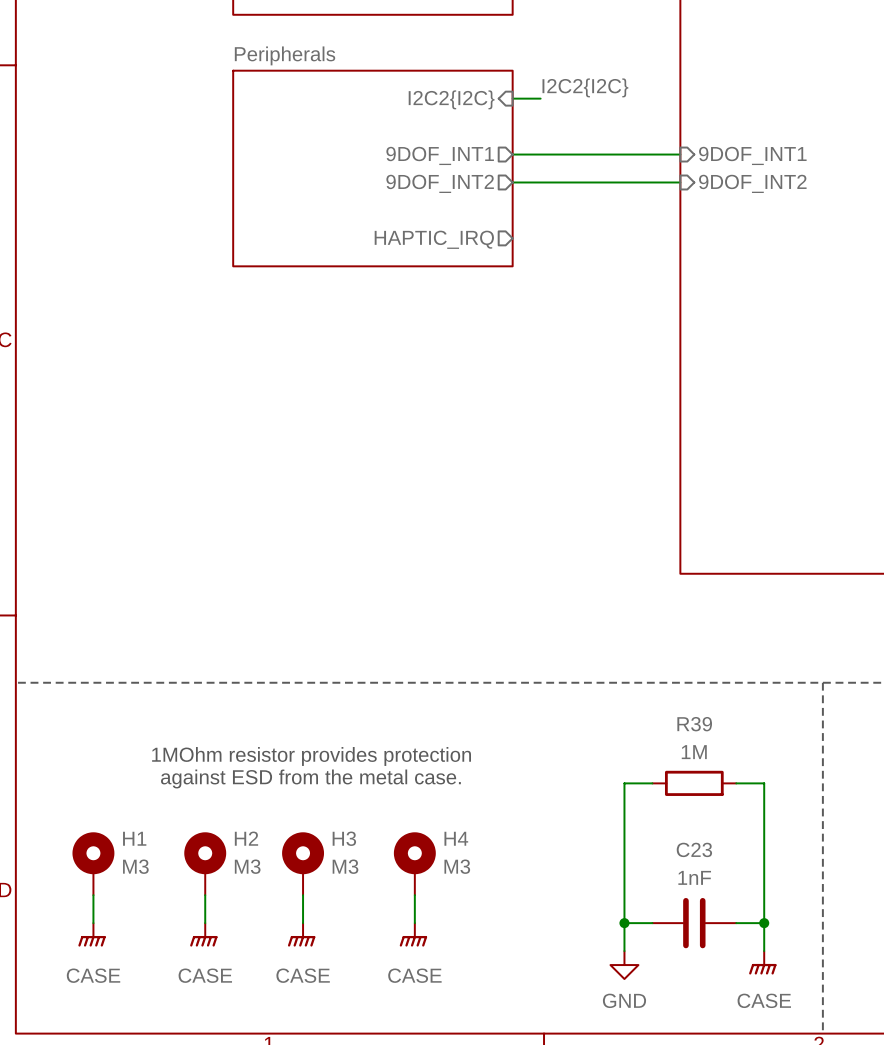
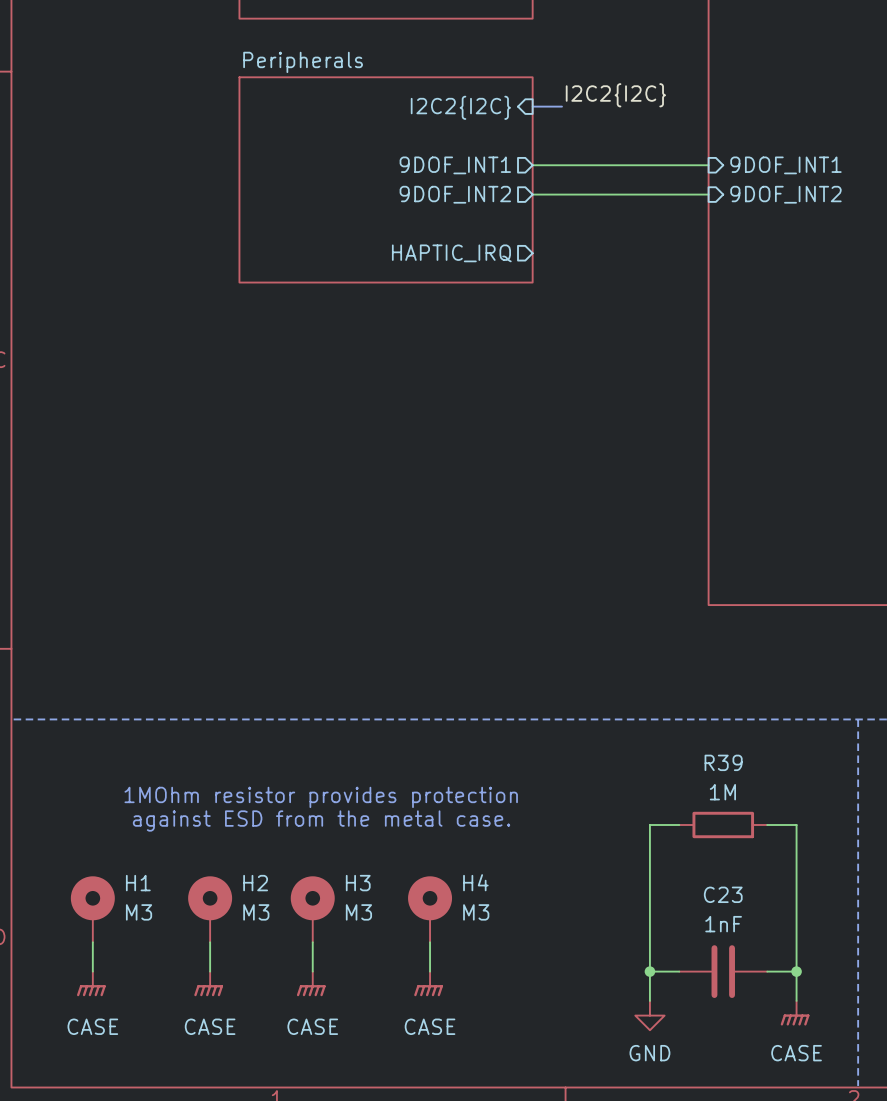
bus: none -> (532, 106) (561, 106)

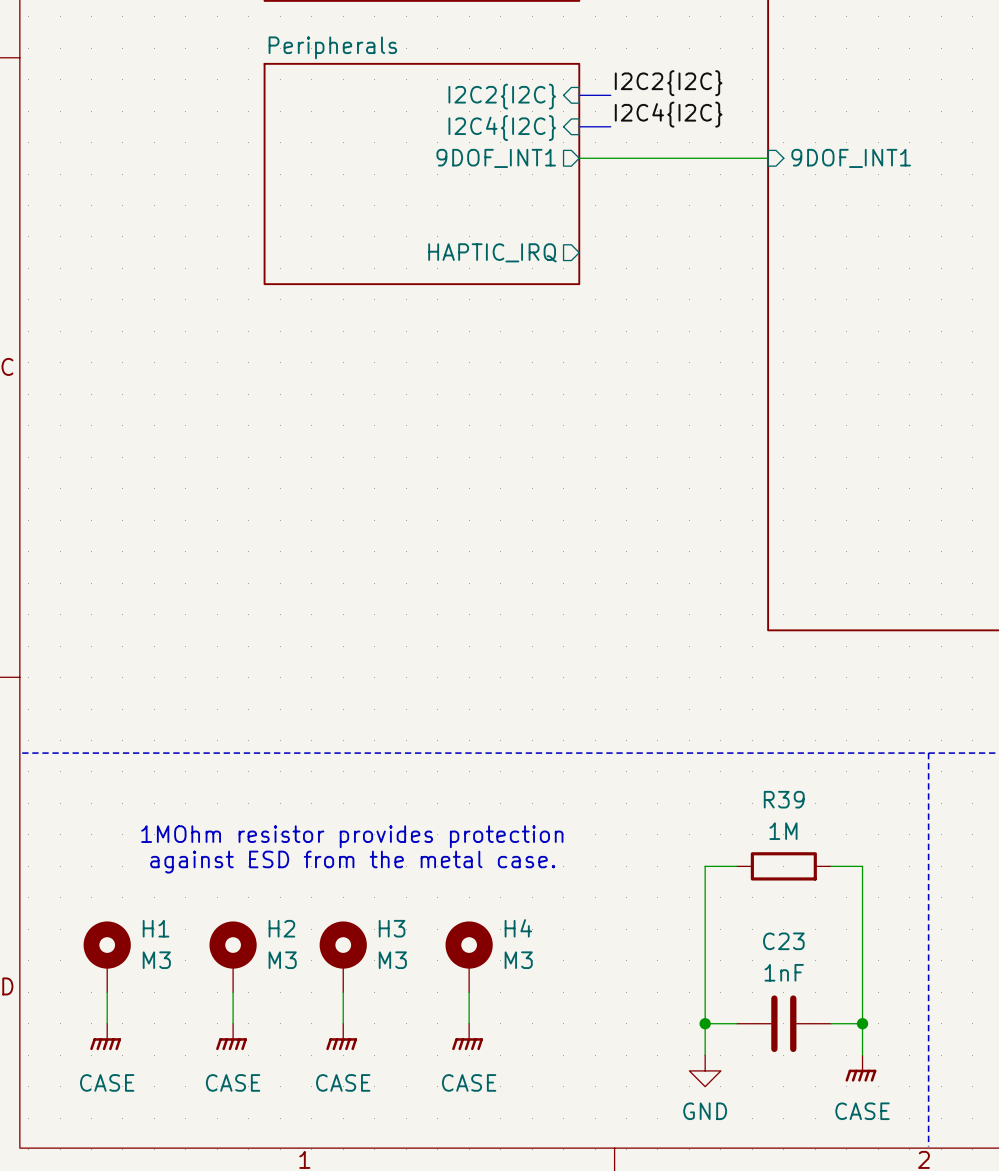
label: none -> I2C4{I2C} (668, 114)
bus: none -> (579, 126) (610, 126)
sheet pin: none -> I2C4{I2C} (502, 128)
sheet pin: 9DOF_INT2 (455, 194) -> none
wire: (532, 194) (708, 194) -> none
sheet pin: 9DOF_INT2 (785, 194) -> none

